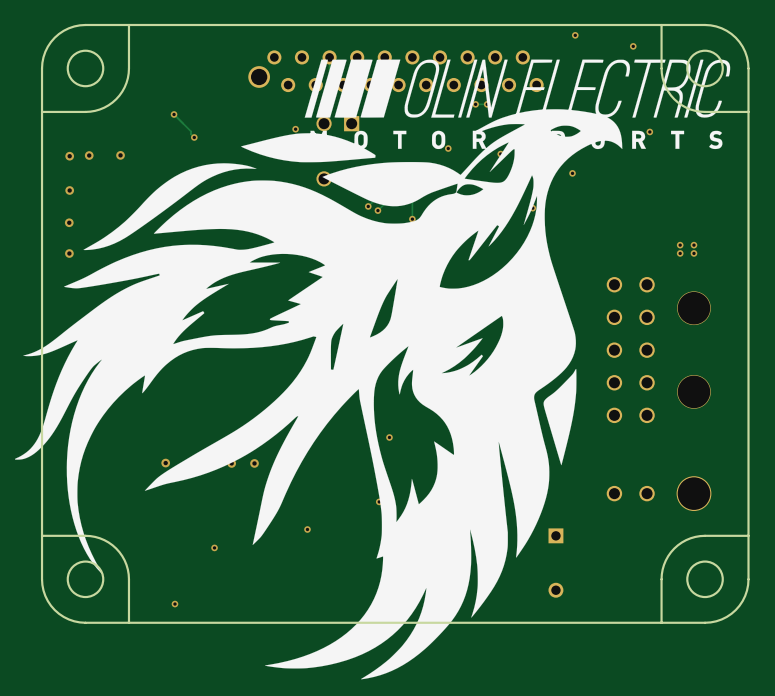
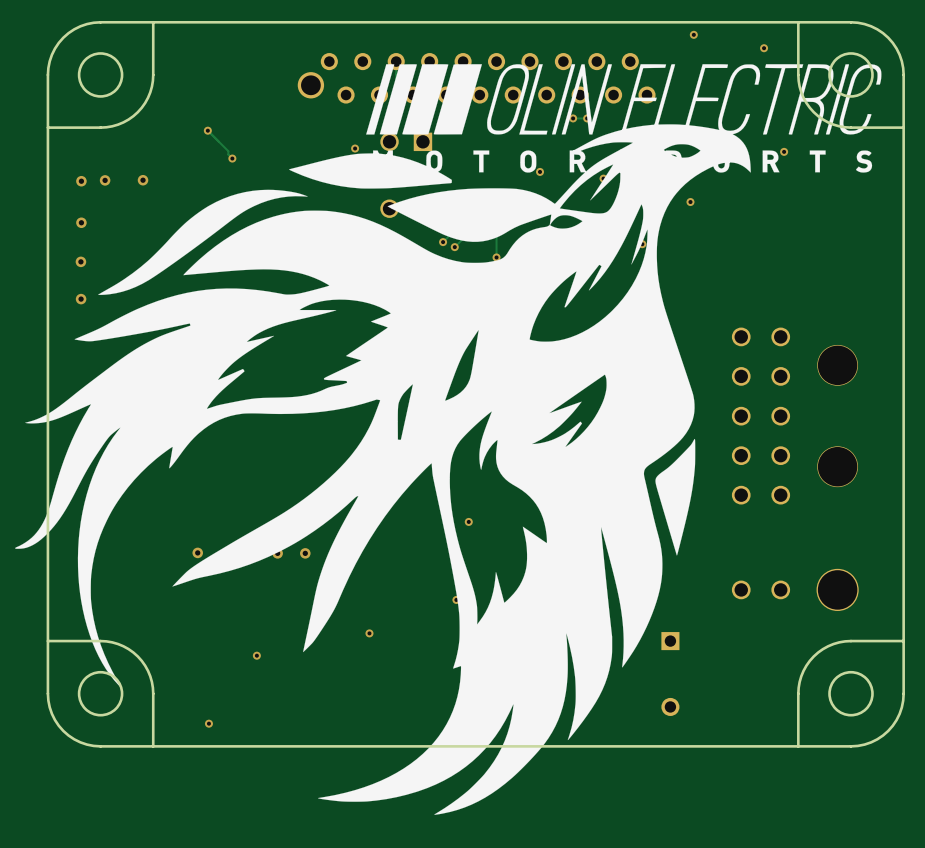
via: (680, 245) -> none
via: (693, 245) -> none
via: (680, 253) -> none
via: (693, 253) -> none

